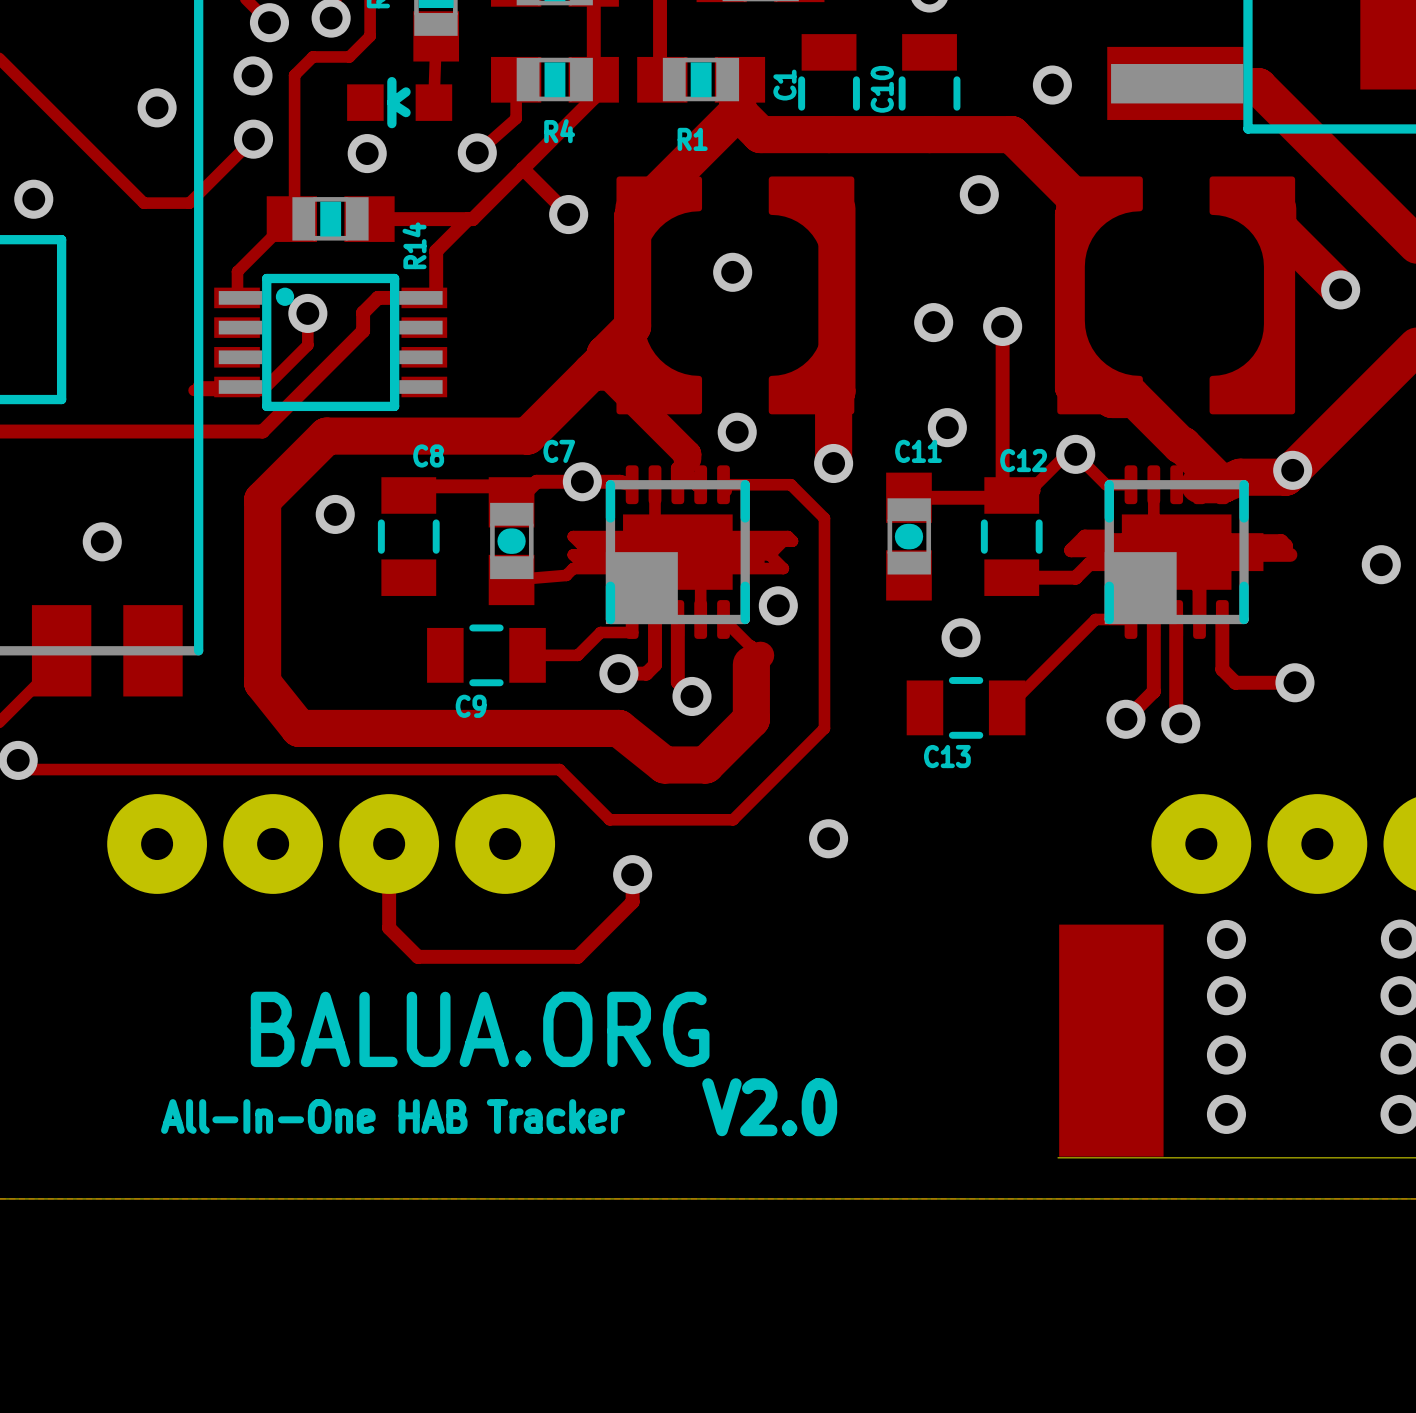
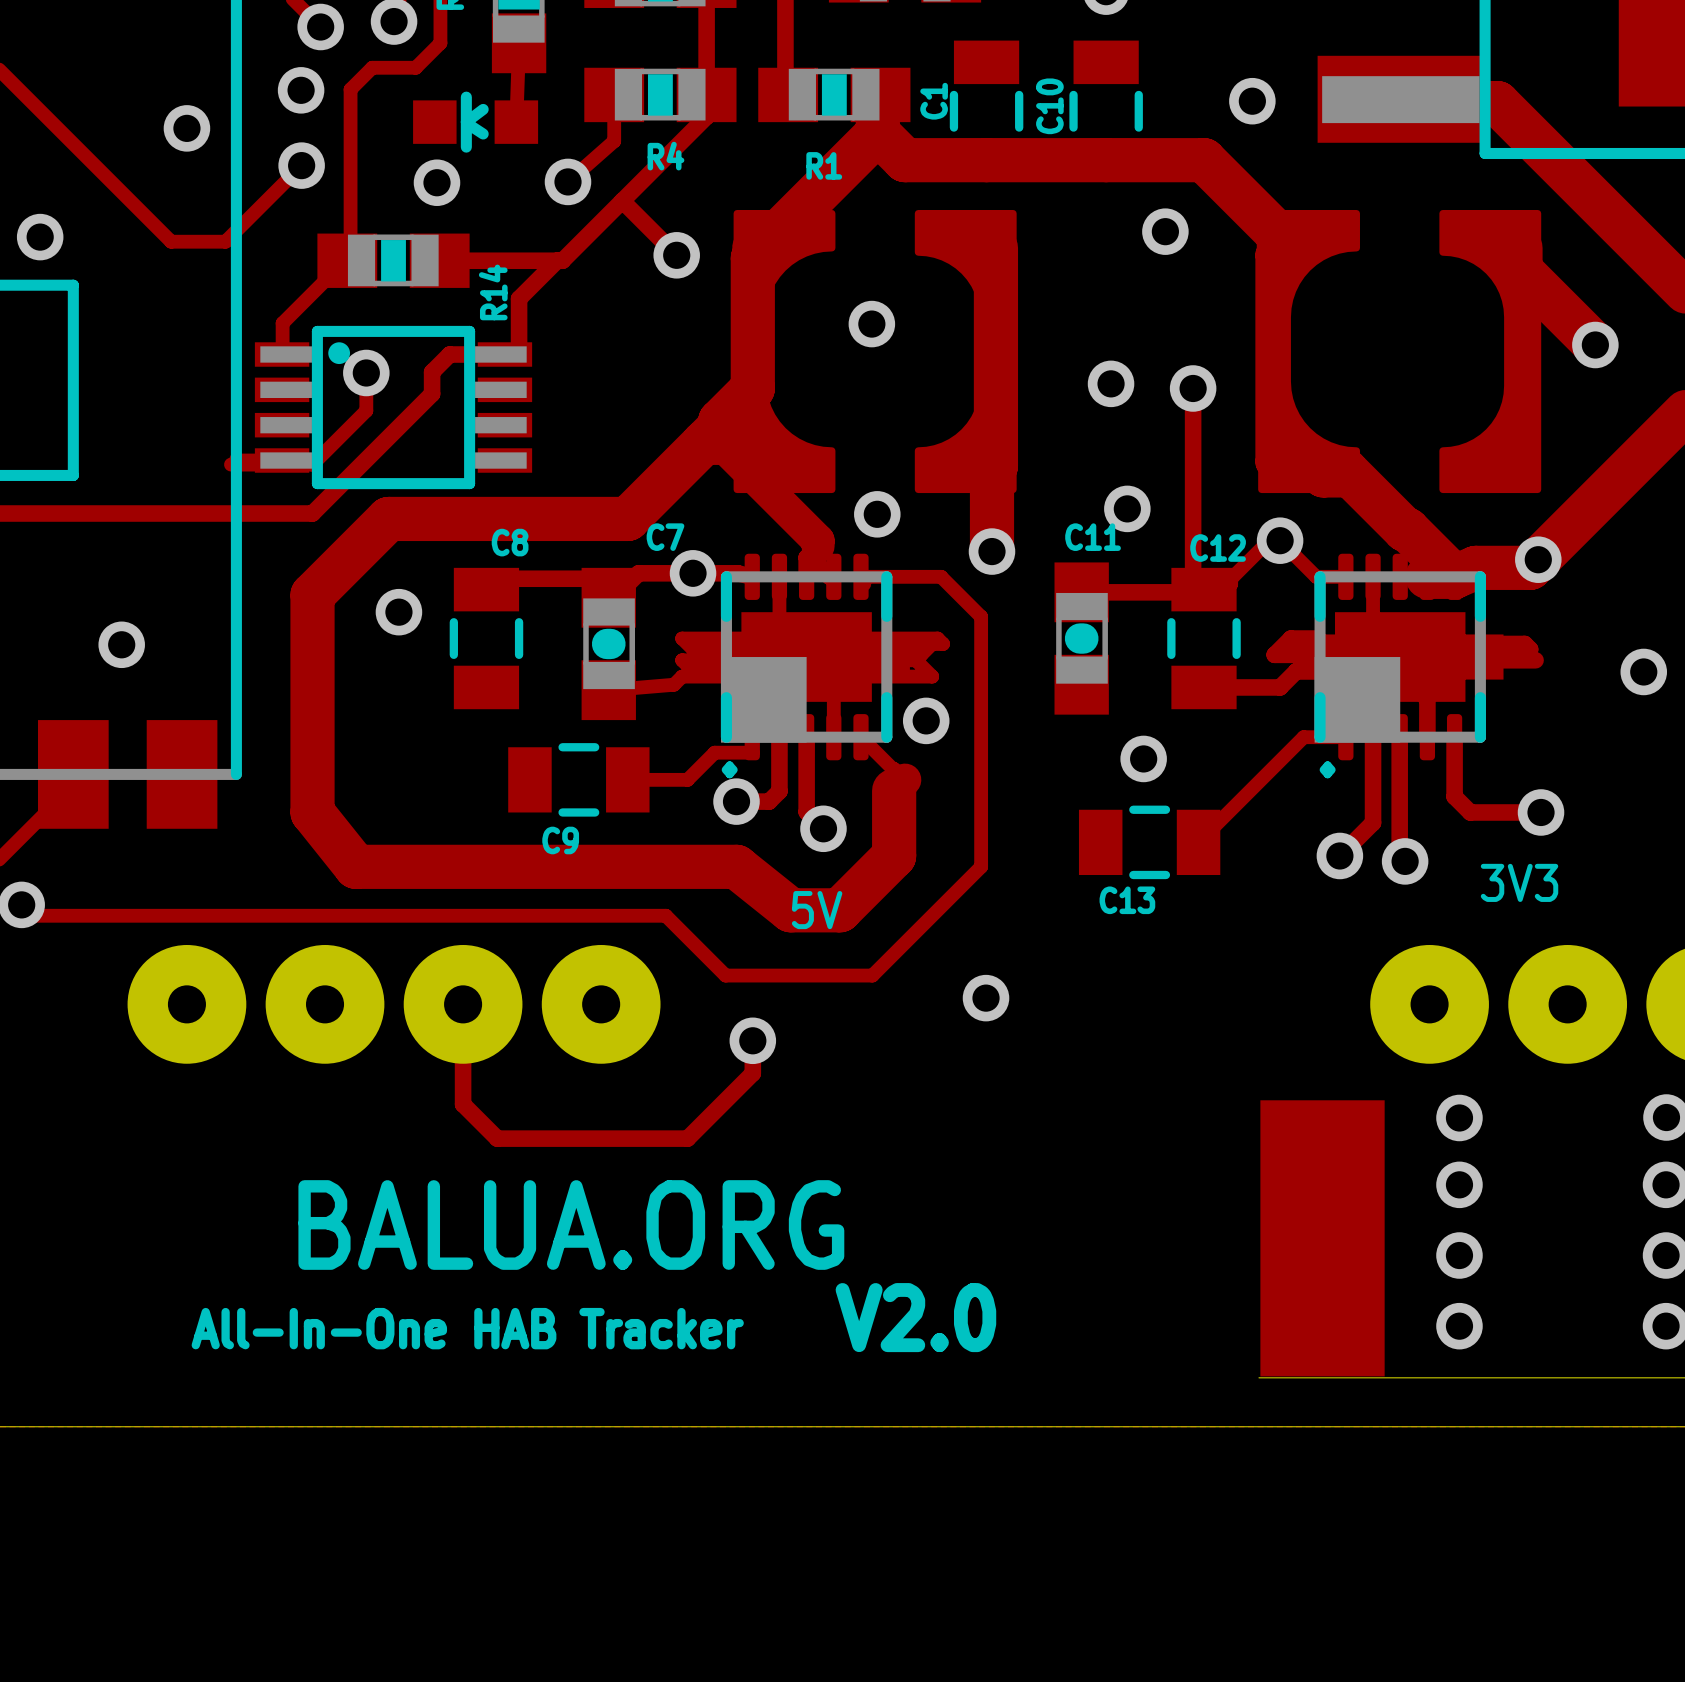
text: none -> . (729, 769)
text: none -> . (1327, 769)
text: none -> 3V3 (1519, 882)
text: none -> 5V (817, 910)

